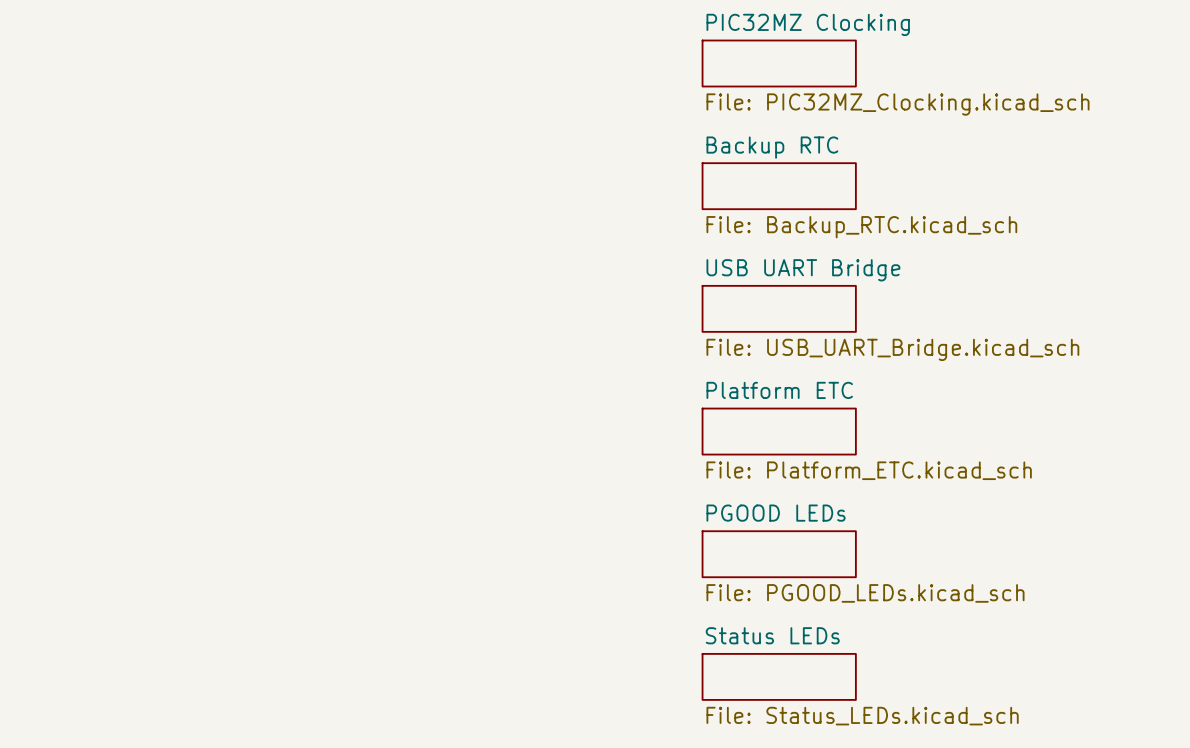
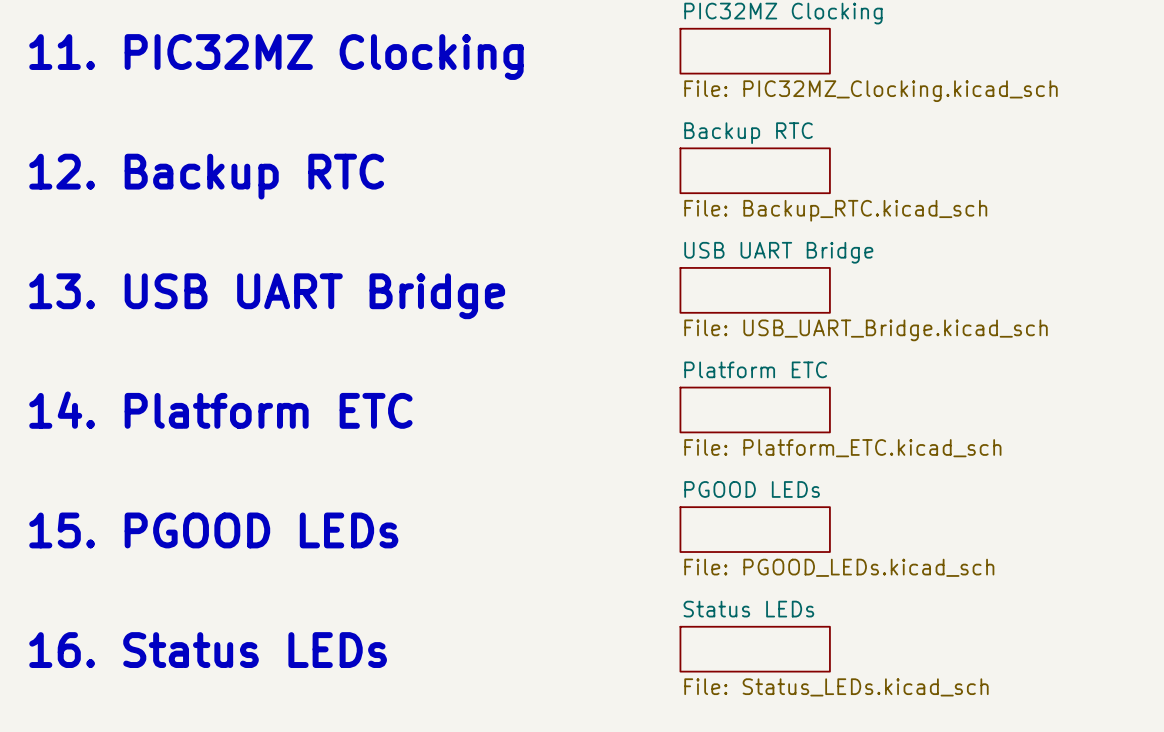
text: none -> 11. PIC32MZ Clocking (276, 57)
text: none -> 12. Backup RTC (206, 176)
text: none -> 13. USB UART Bridge (267, 296)
text: none -> 14. Platform ETC (220, 410)
text: none -> 15. PGOOD LEDs (213, 530)
text: none -> 16. Status LEDs (208, 650)

